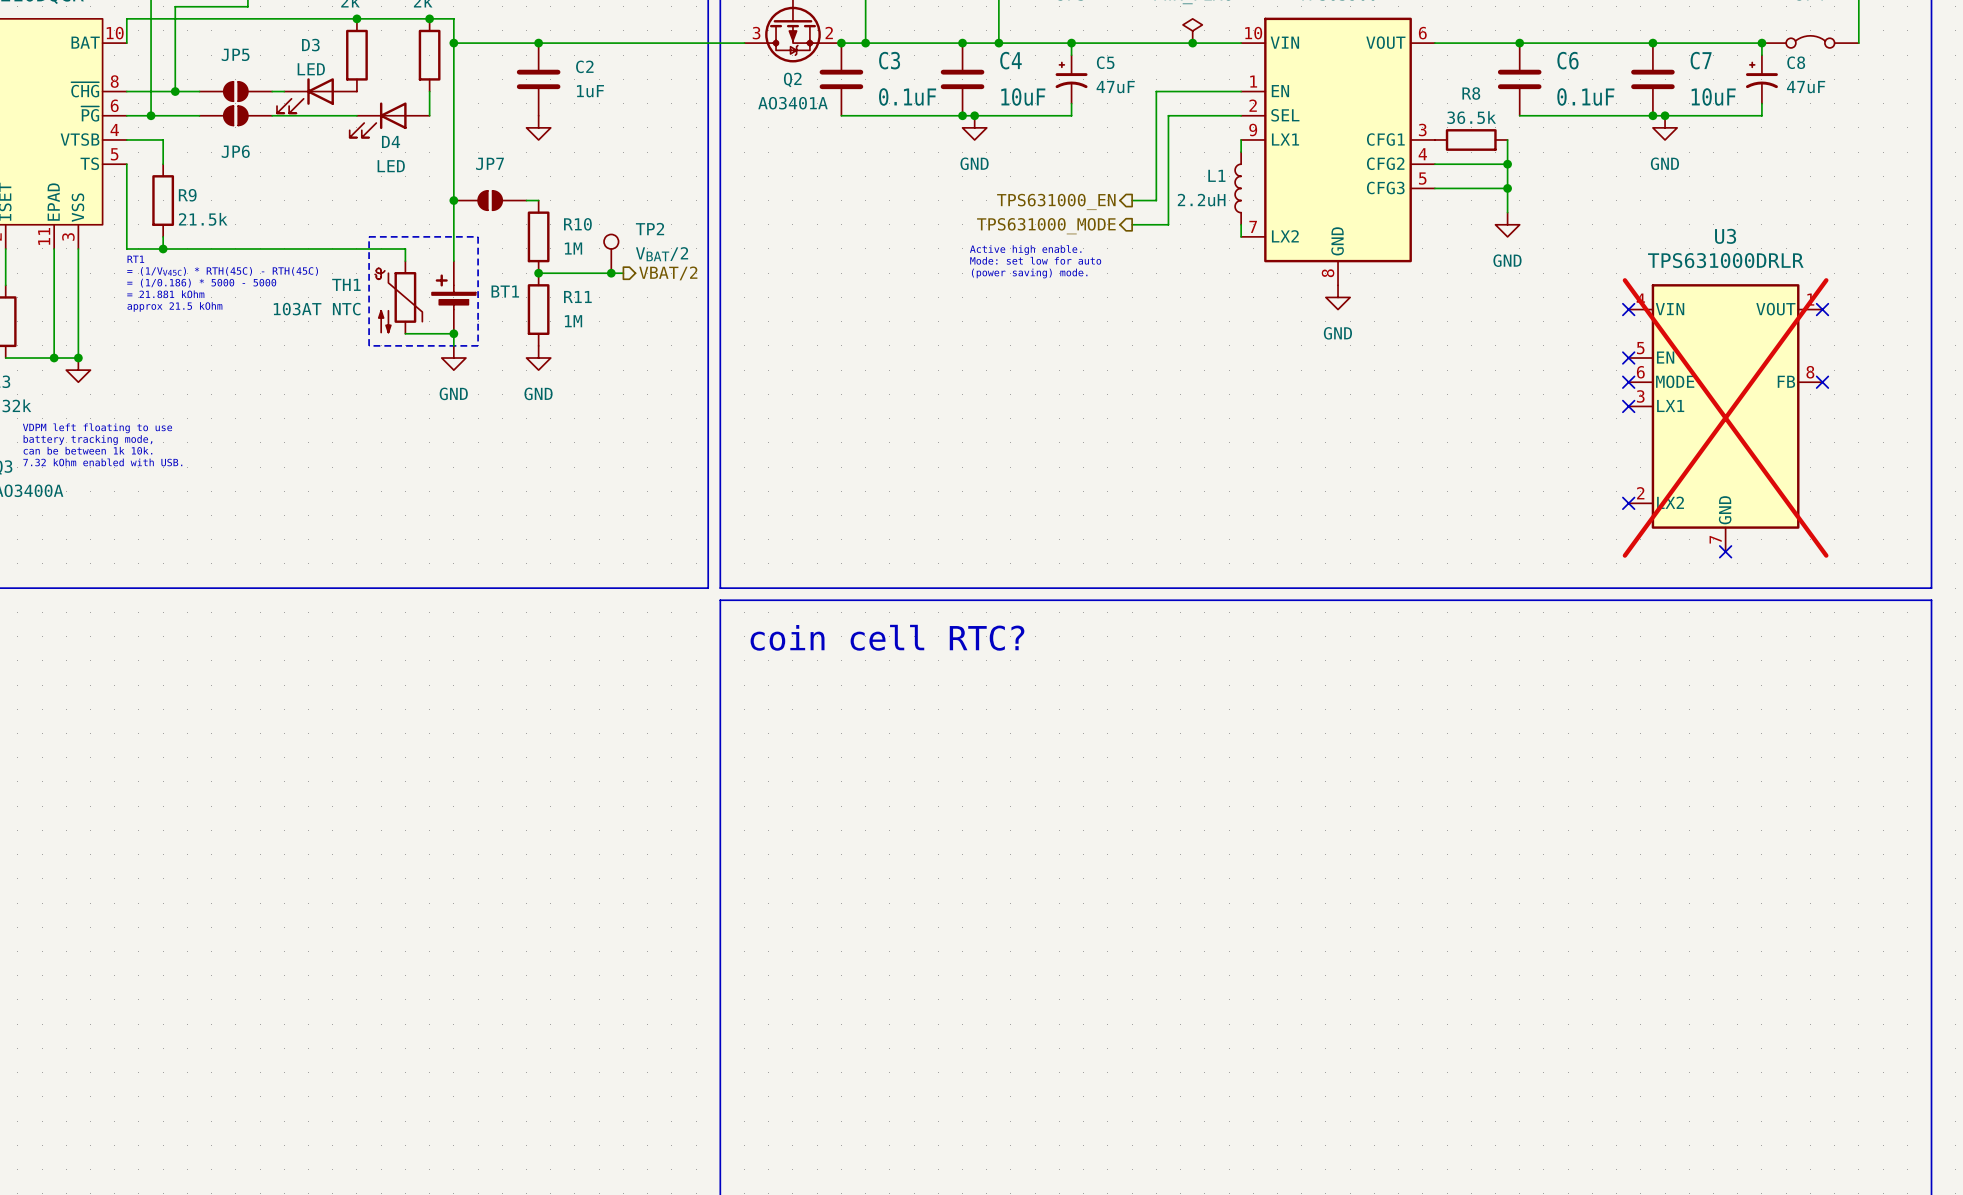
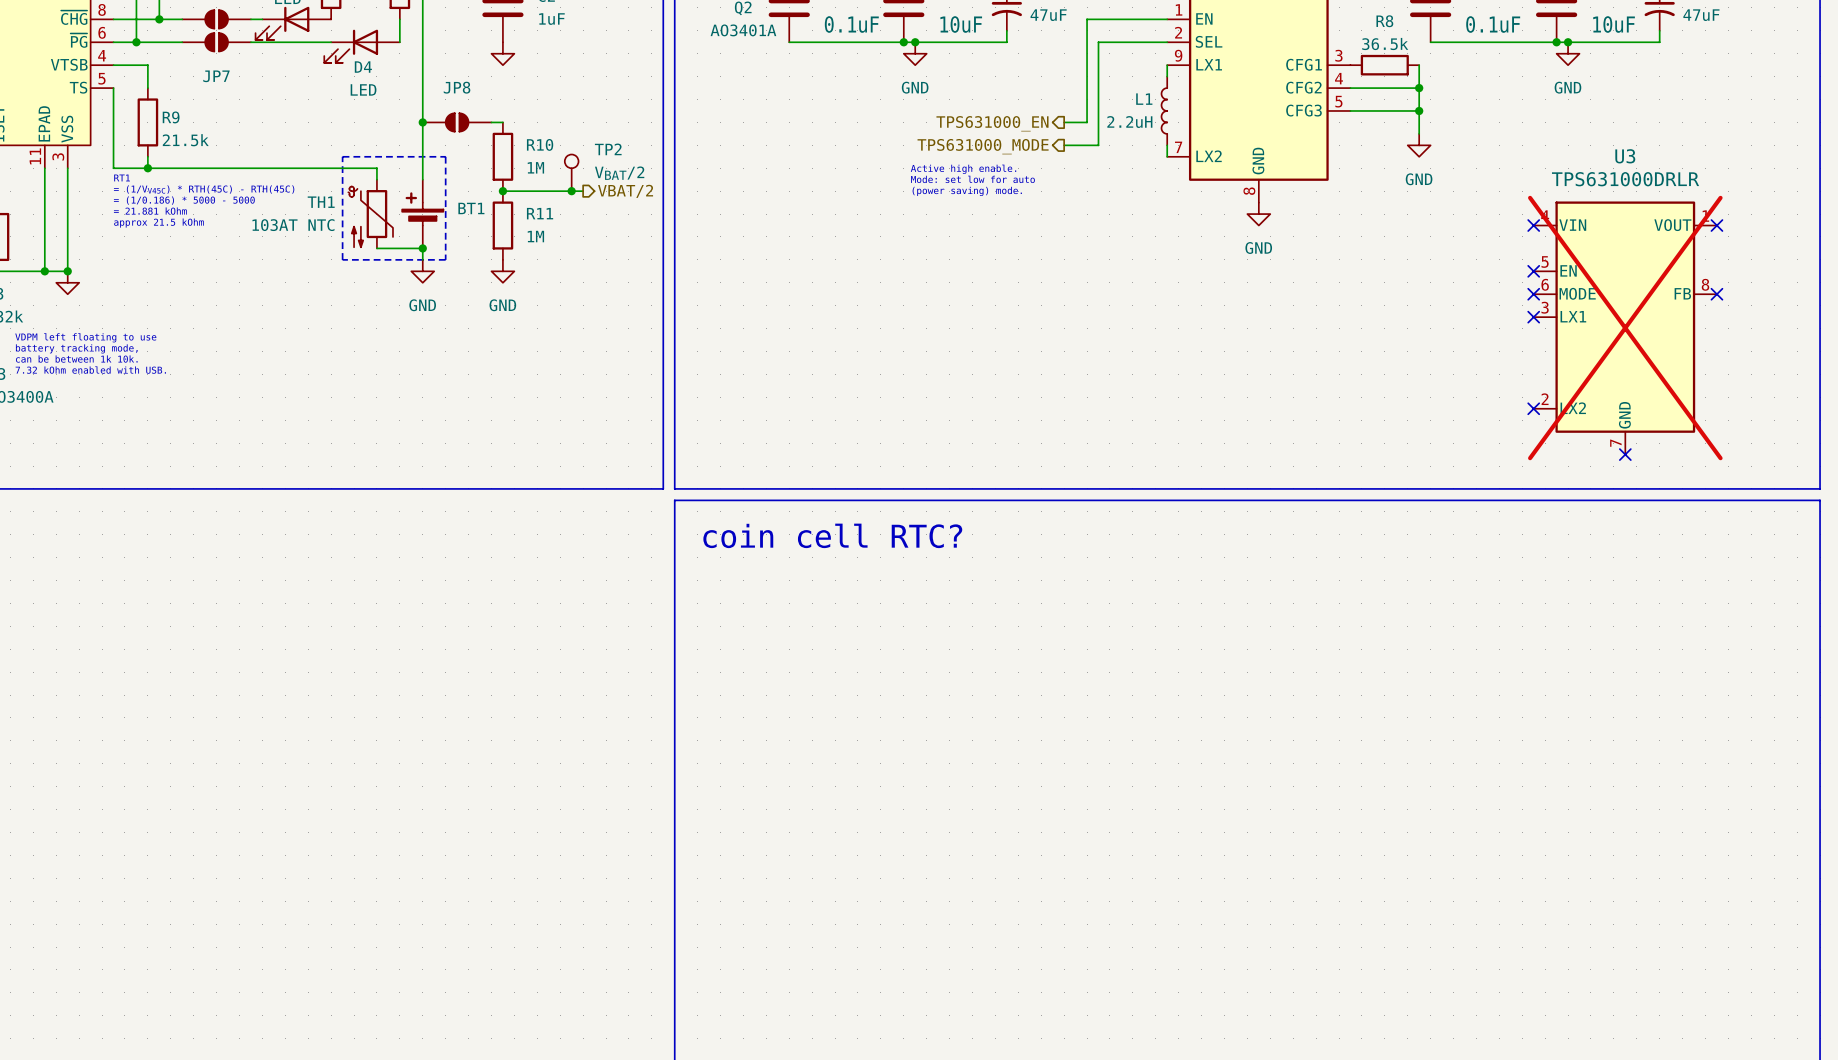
JP6 name: JP6 (235, 151) -> JP7 (216, 76)
JP7 name: JP7 (490, 163) -> JP8 (457, 87)

